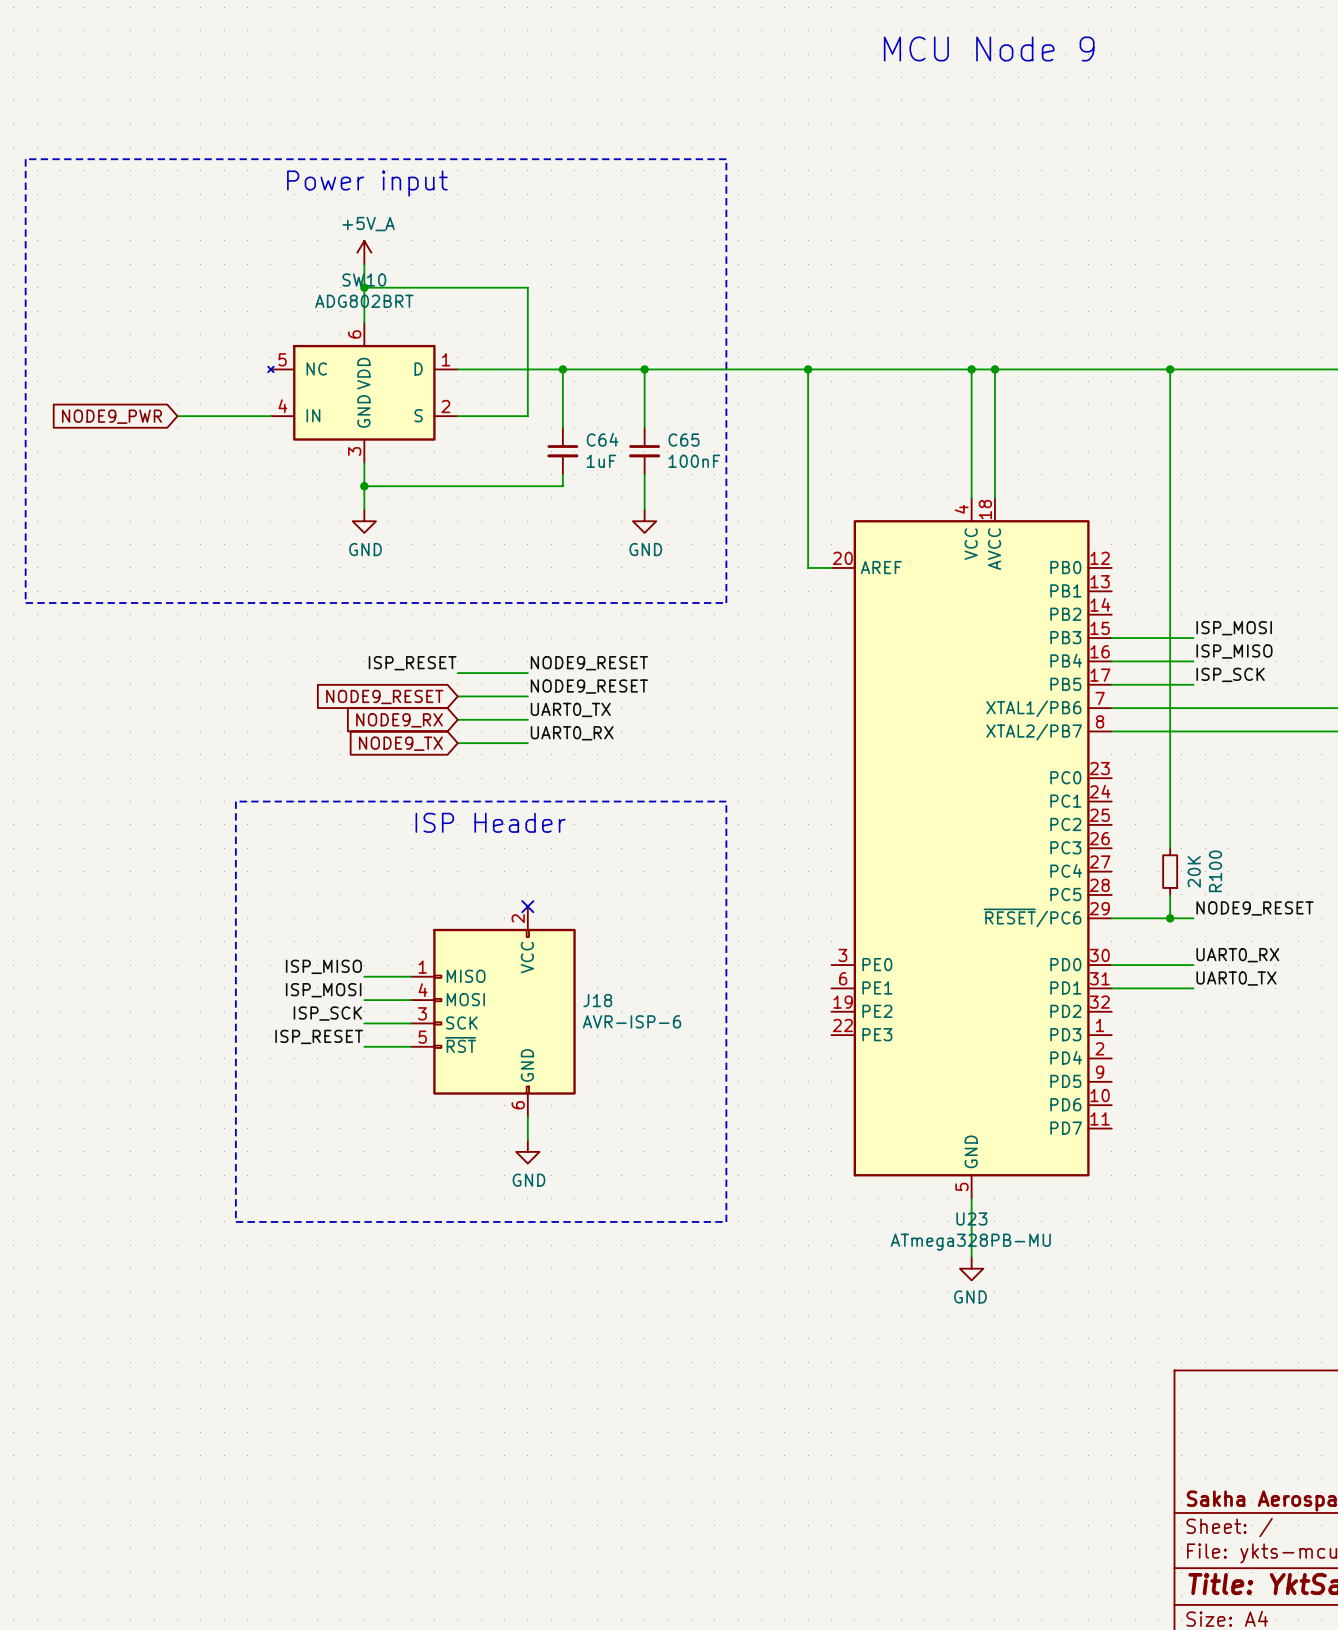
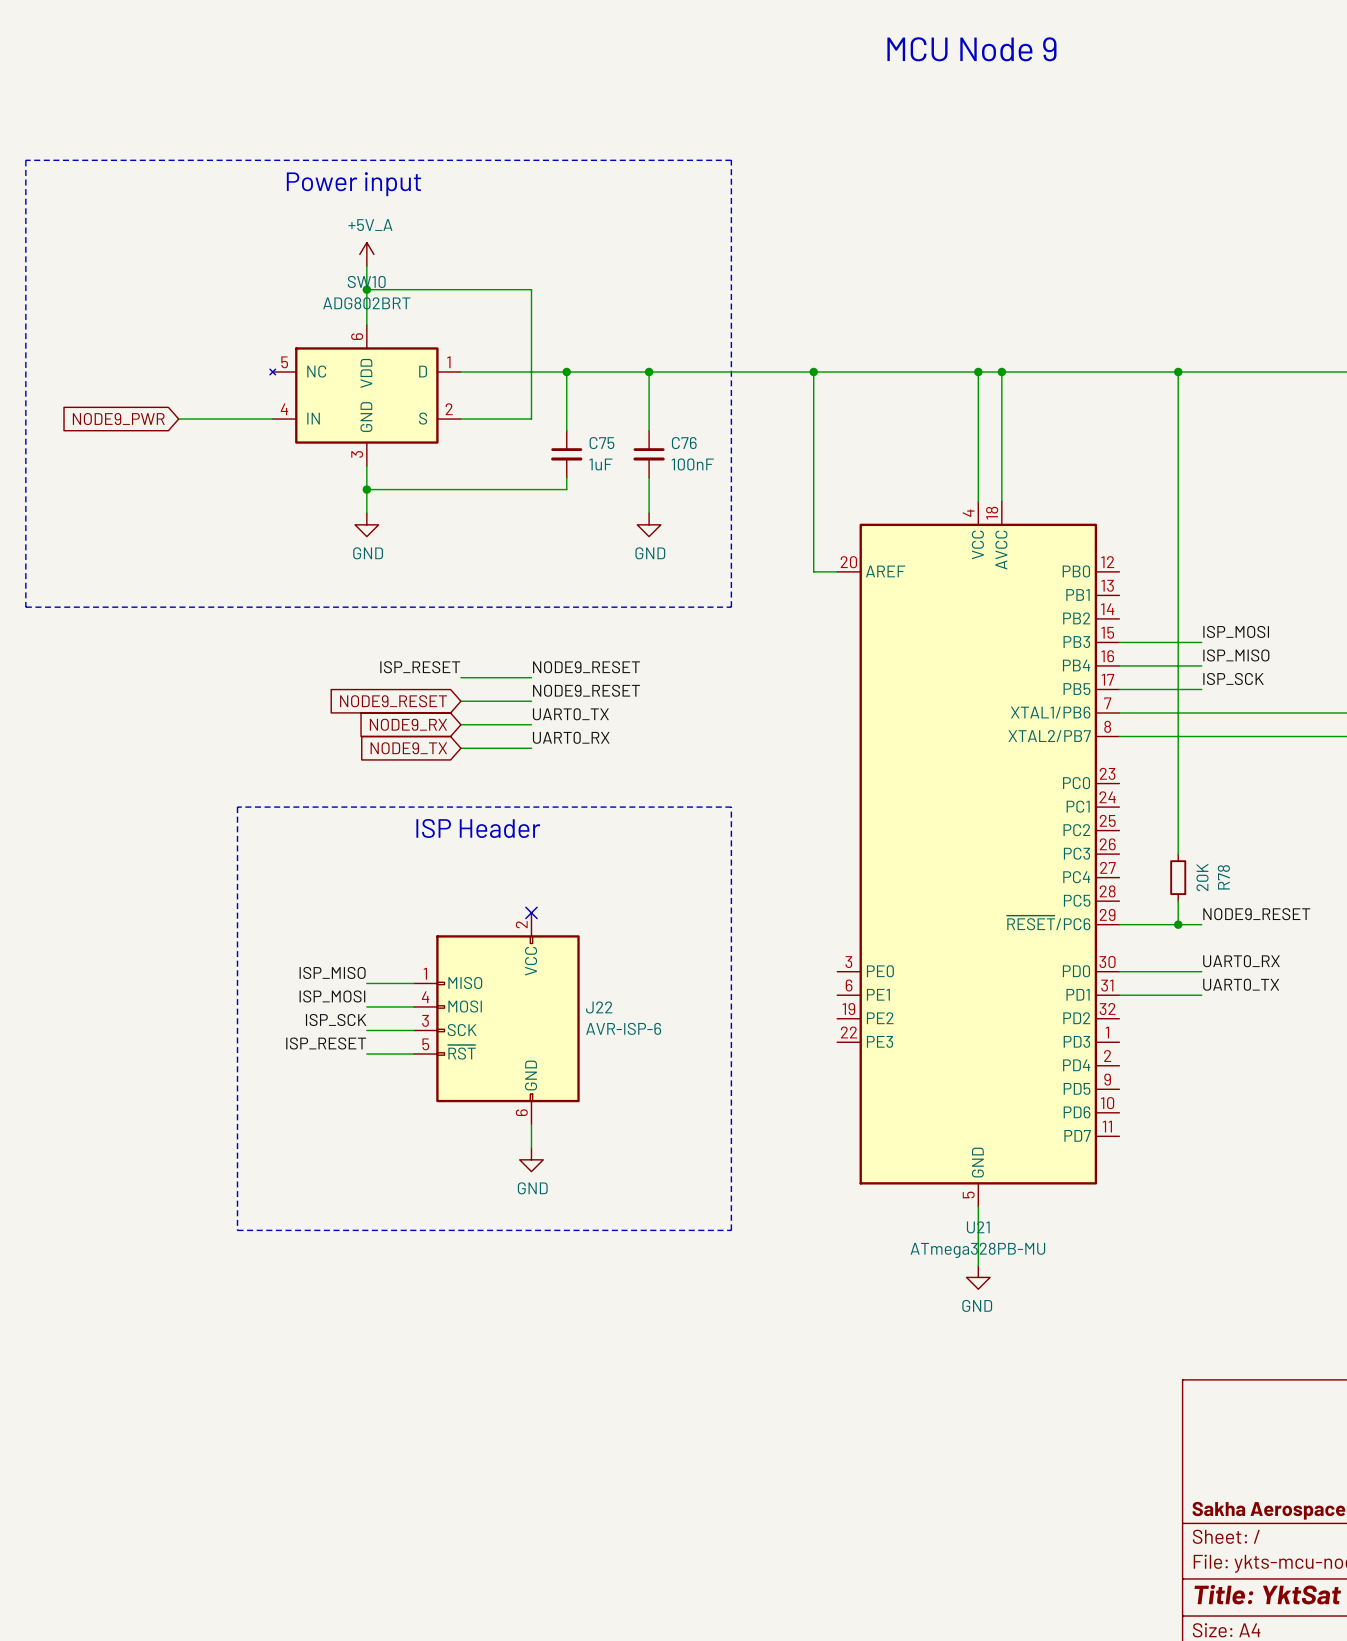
C64 name: C64 (602, 439) -> C75 (601, 443)
C65 name: C65 (683, 440) -> C76 (684, 443)
R100 name: R100 (1215, 871) -> R78 (1223, 877)
J18 name: J18 (597, 1000) -> J22 (599, 1007)
U23 name: U23 (971, 1218) -> U21 (978, 1227)

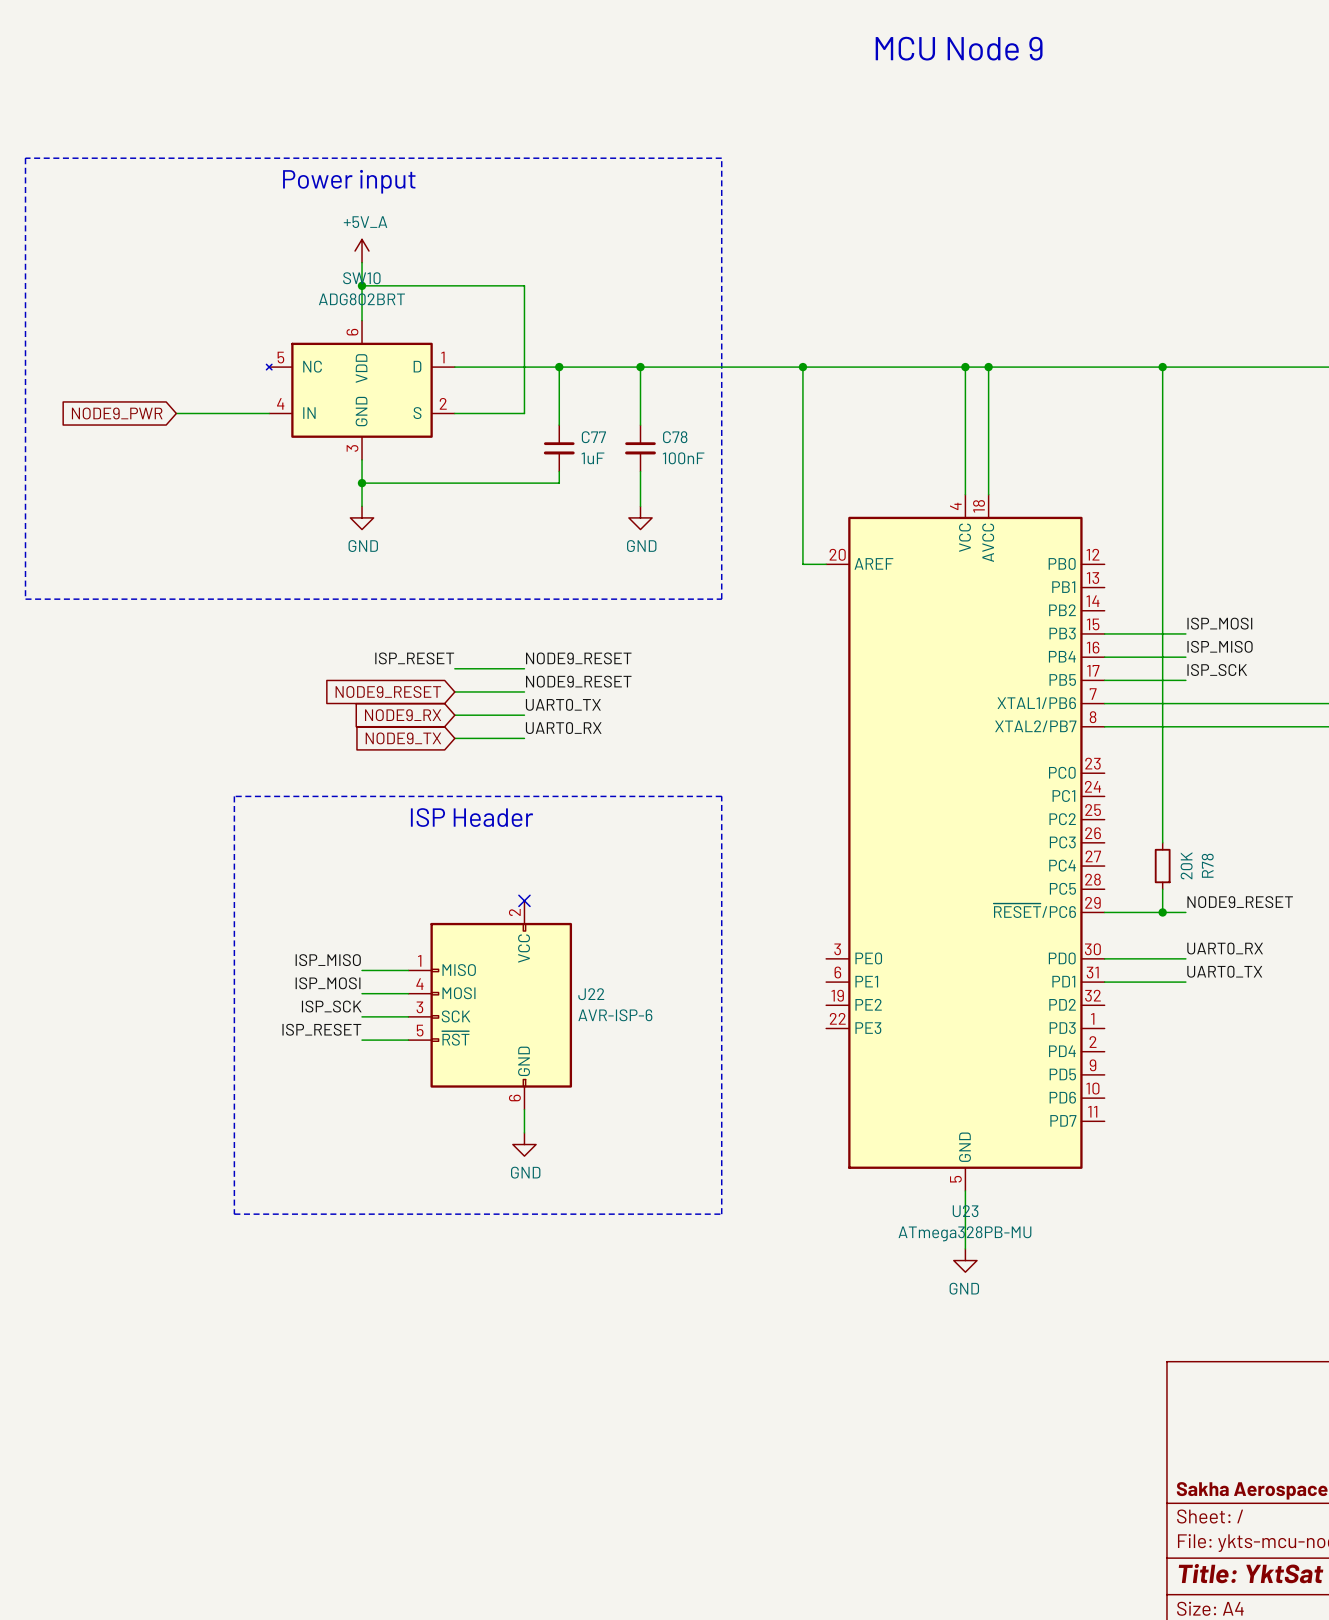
C75 name: C75 (601, 443) -> C77 (593, 437)
C76 name: C76 (684, 443) -> C78 (675, 437)
U21 name: U21 (978, 1227) -> U23 (965, 1211)

